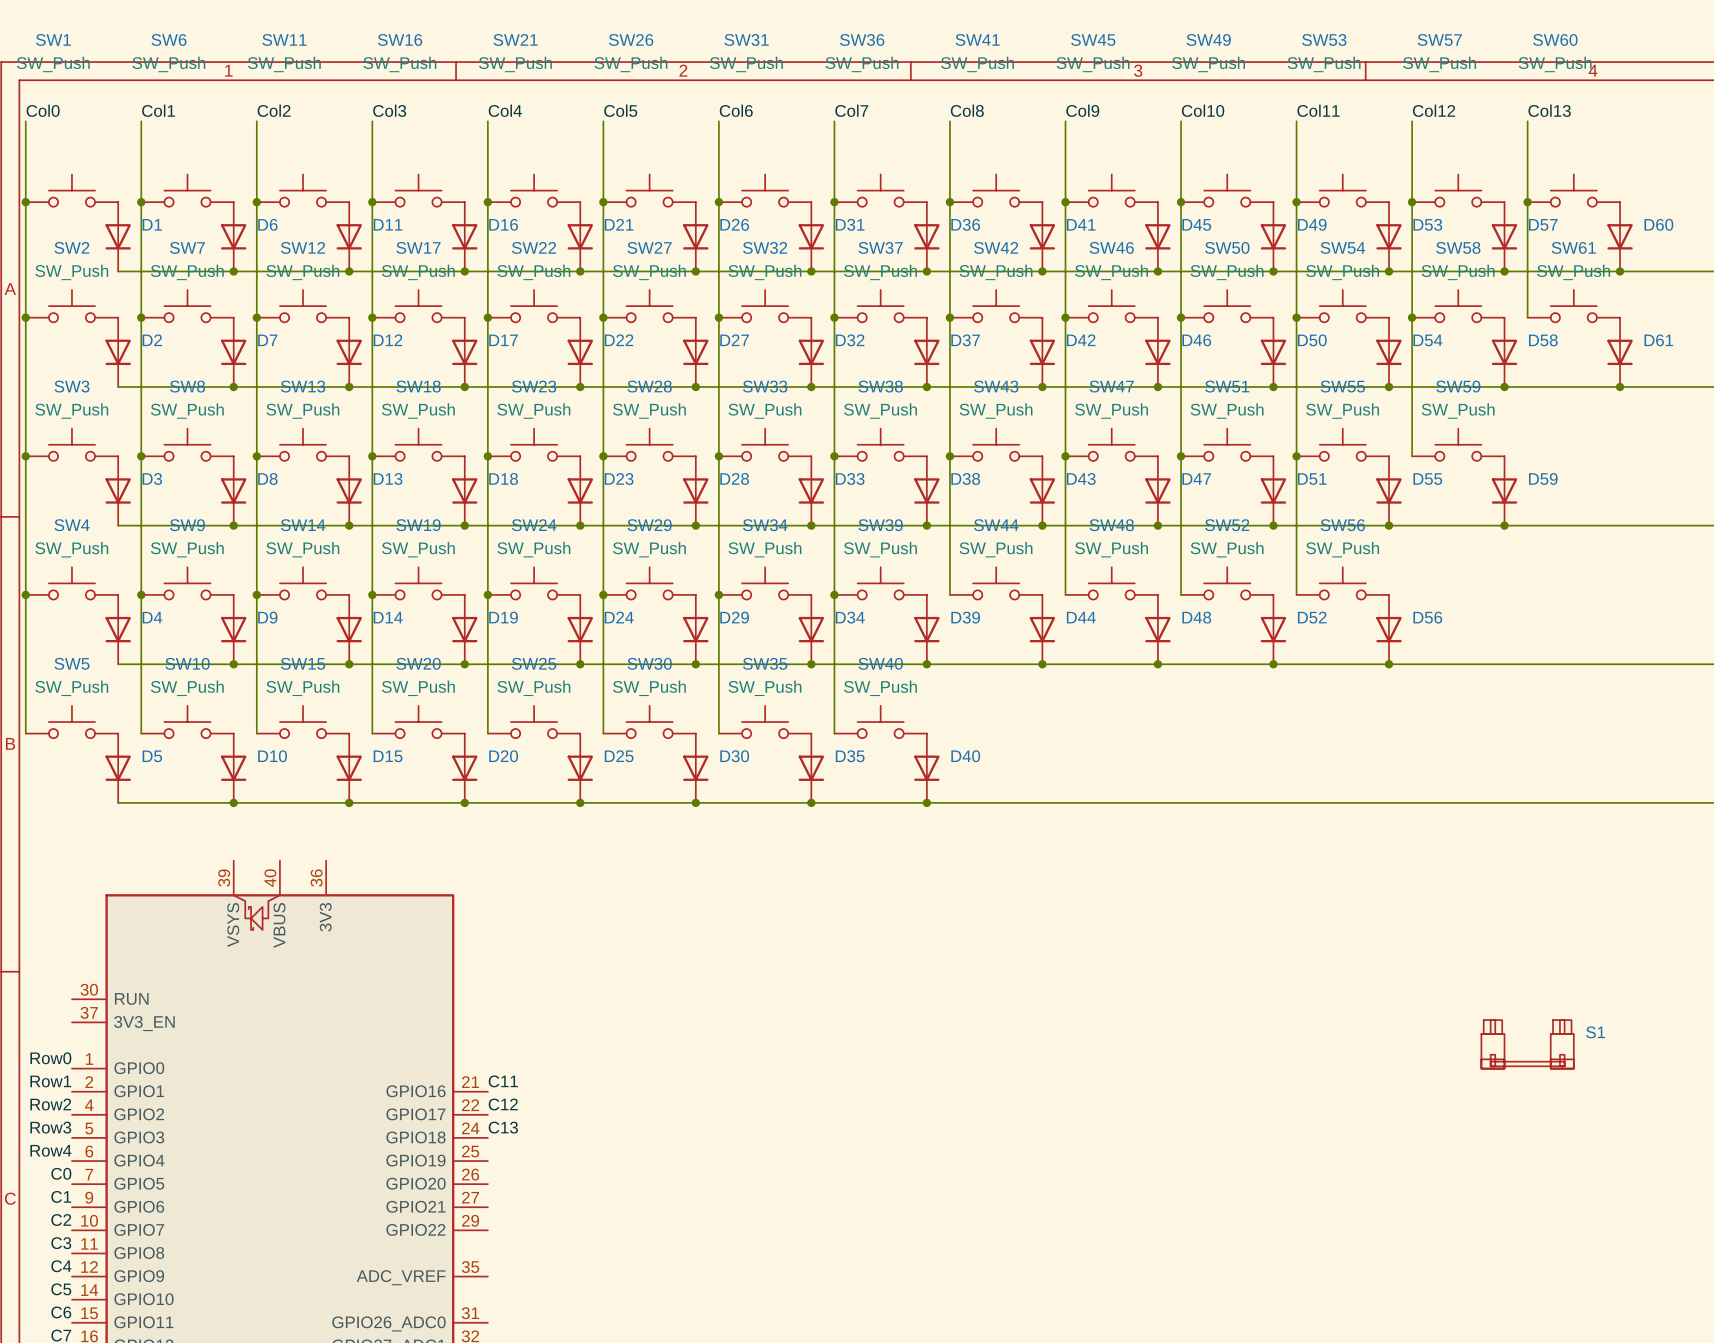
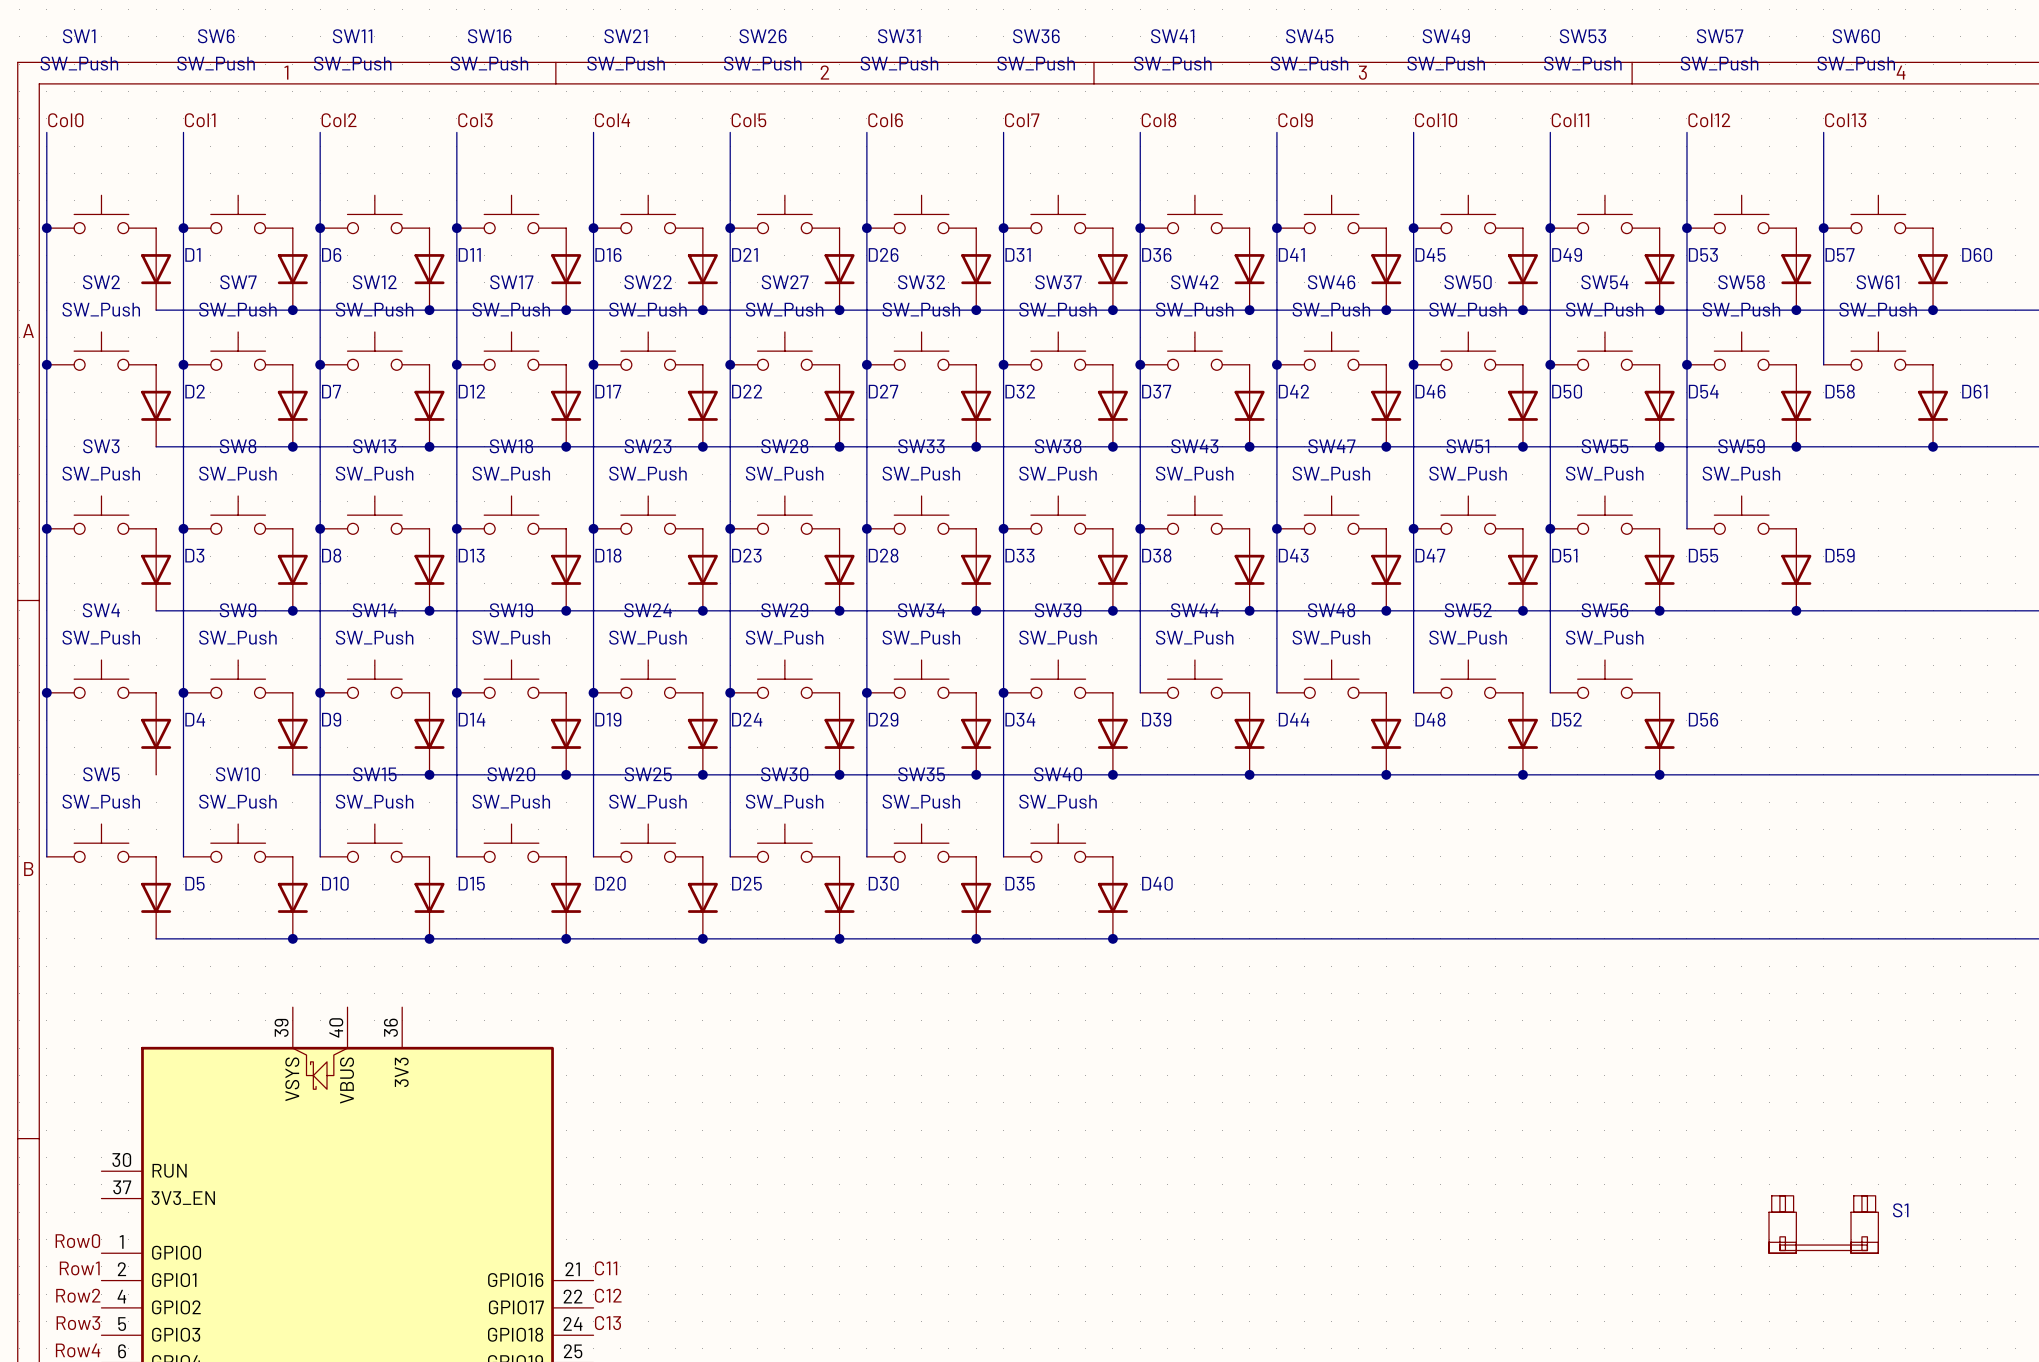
wire: (118, 664) (233, 664) -> none
junction: (233, 664) -> none

